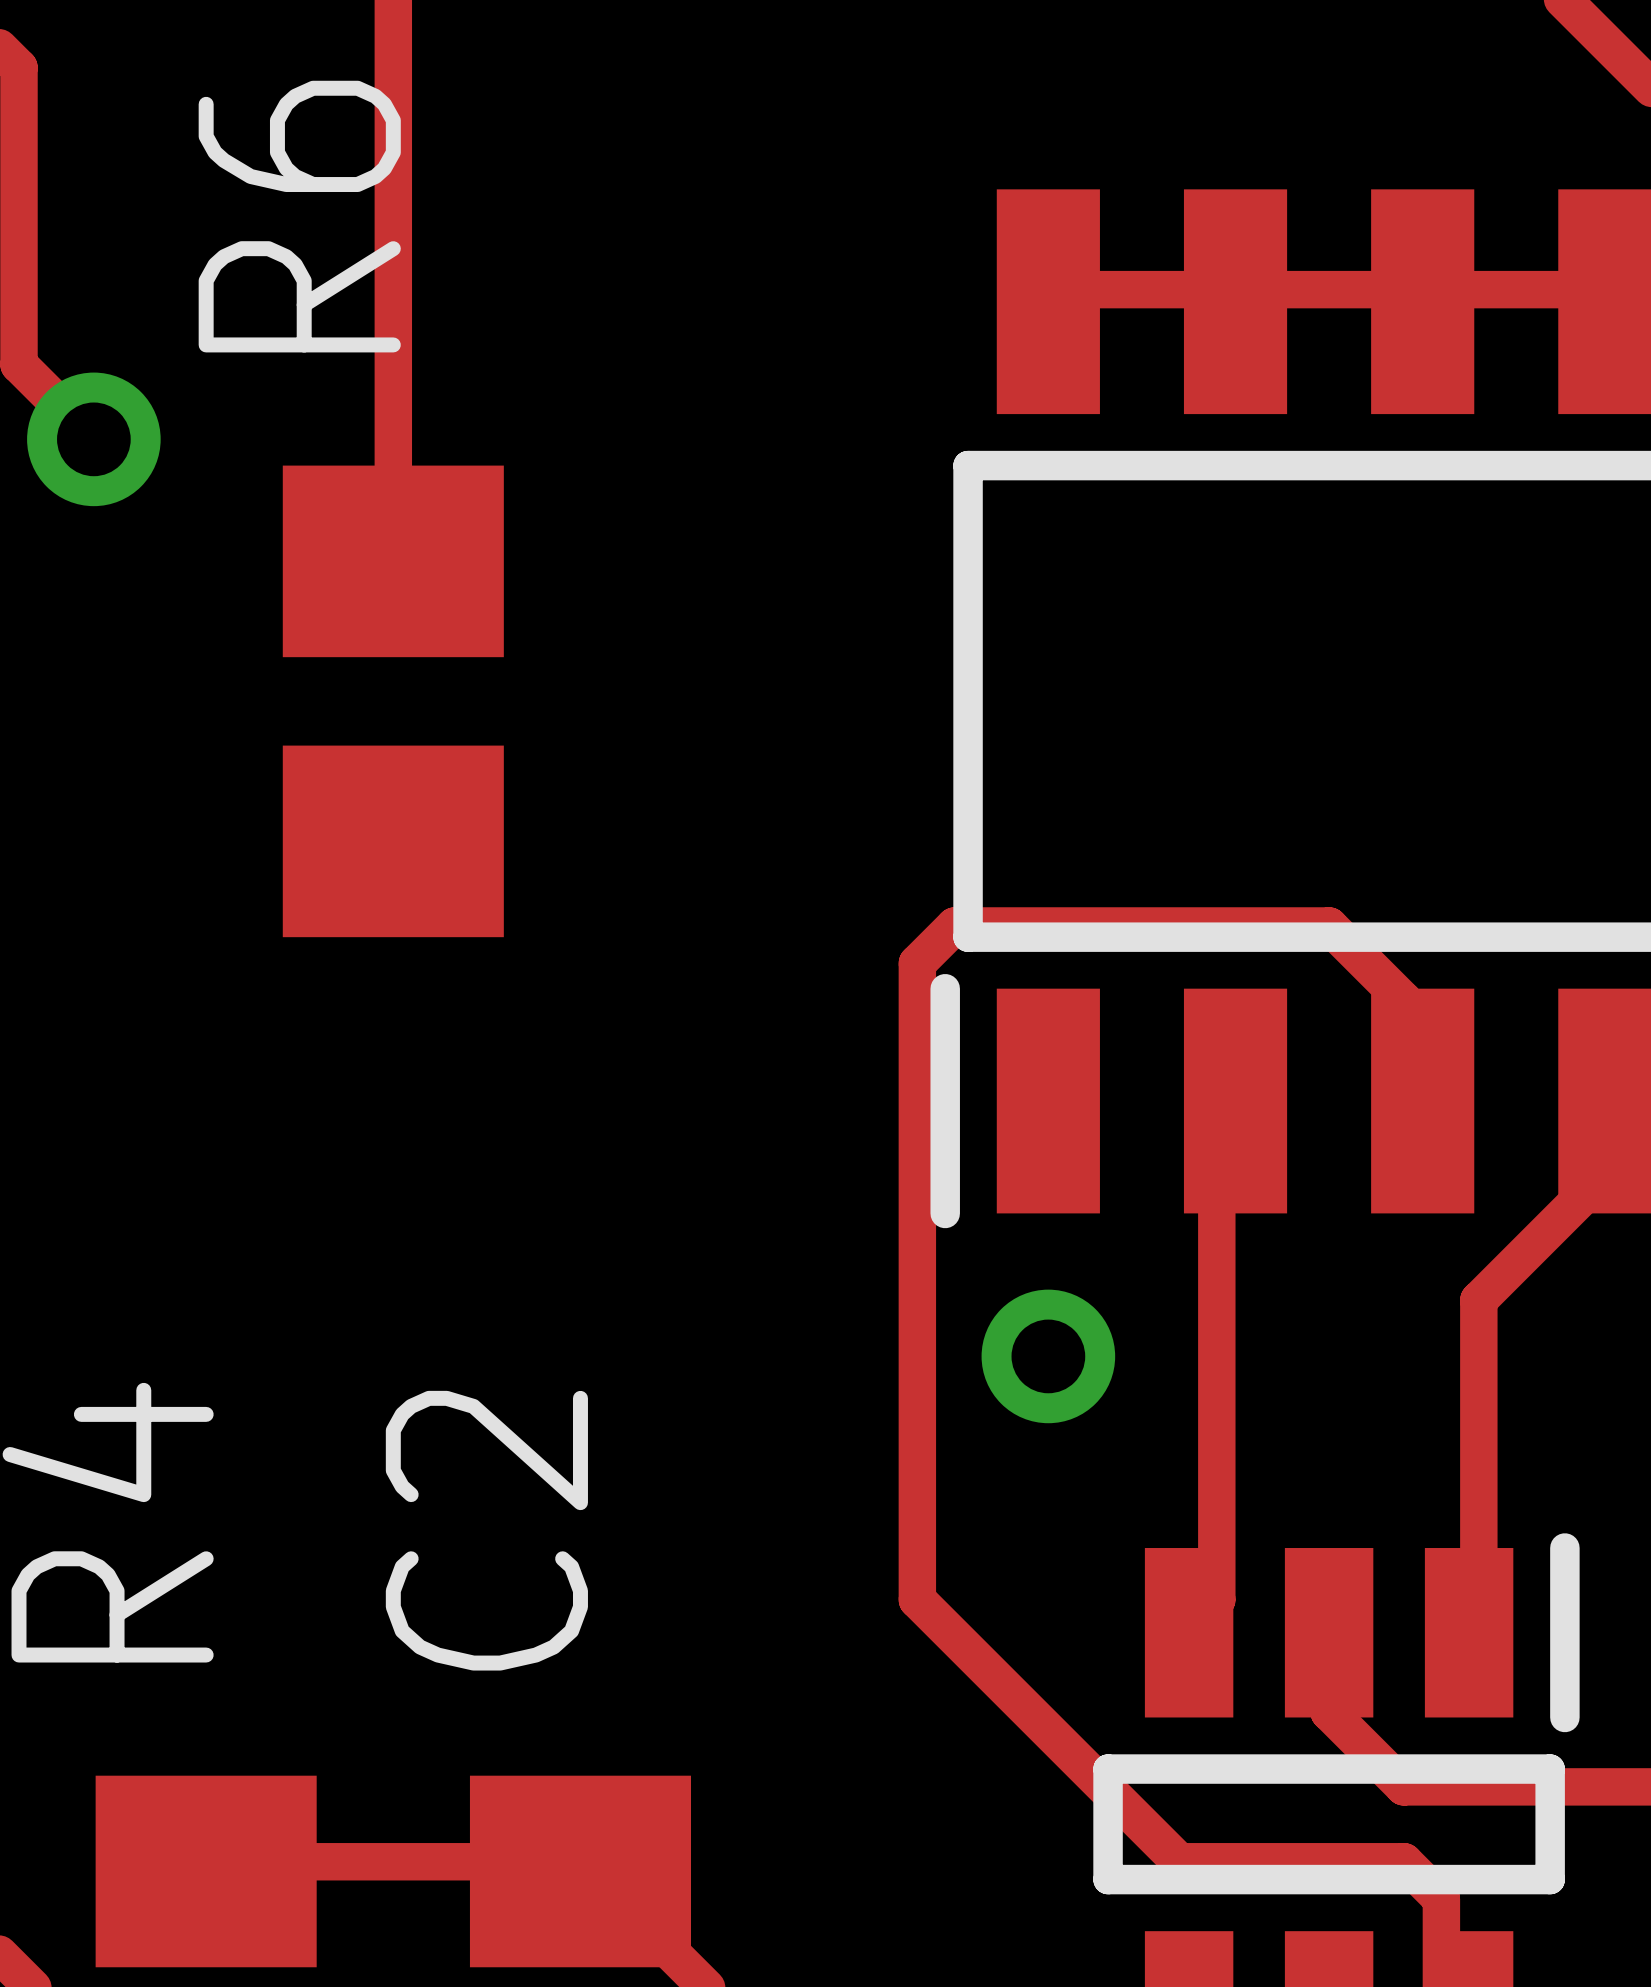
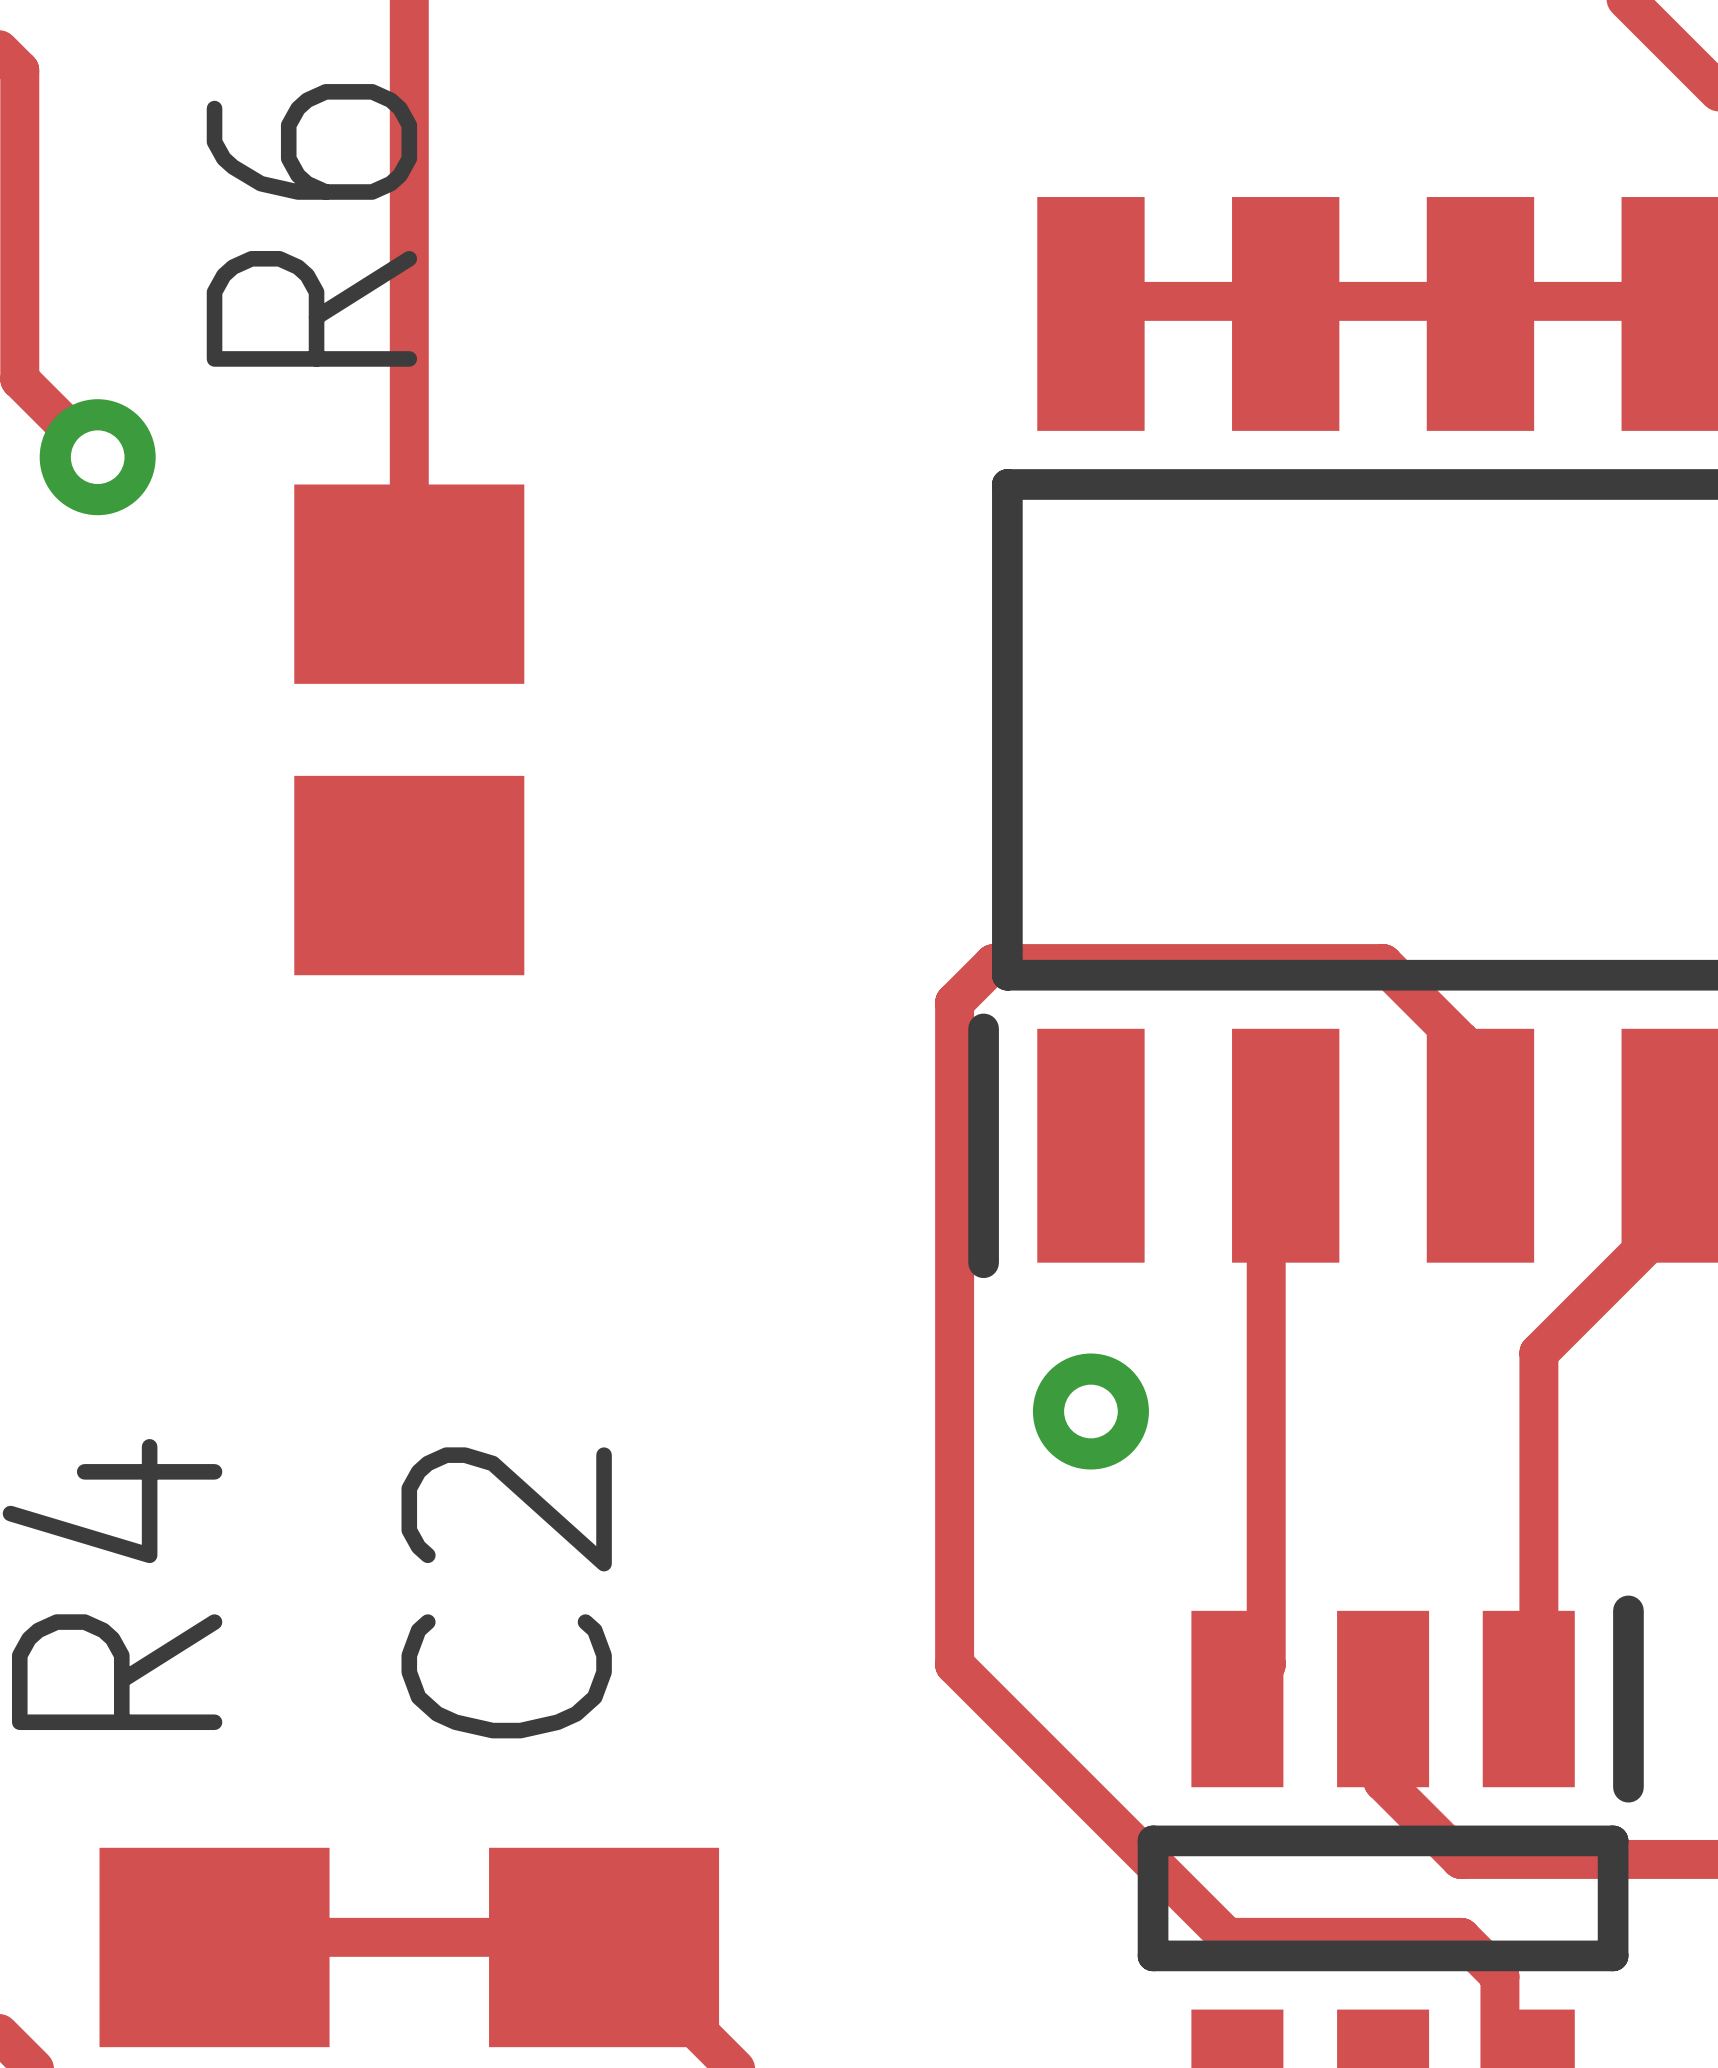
via size: [27, 372, 161, 507] -> [39, 399, 156, 516]
via size: [981, 1289, 1116, 1424] -> [1032, 1353, 1149, 1470]

